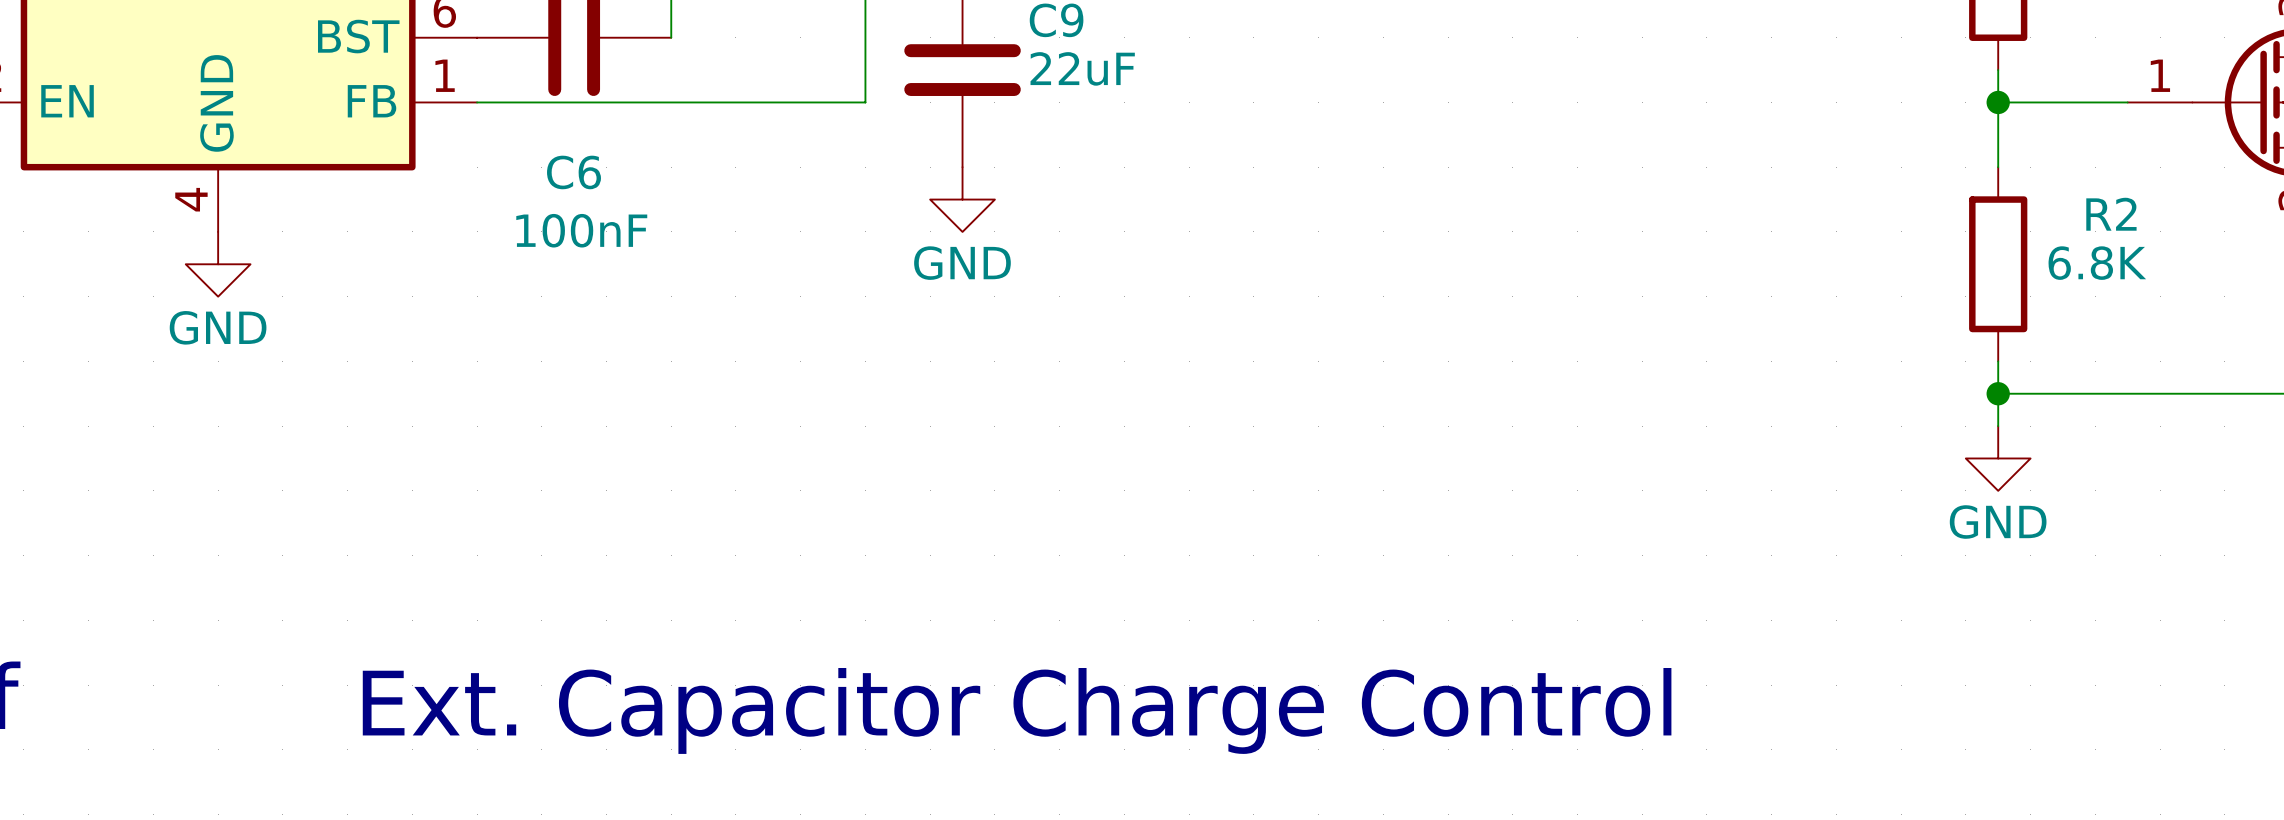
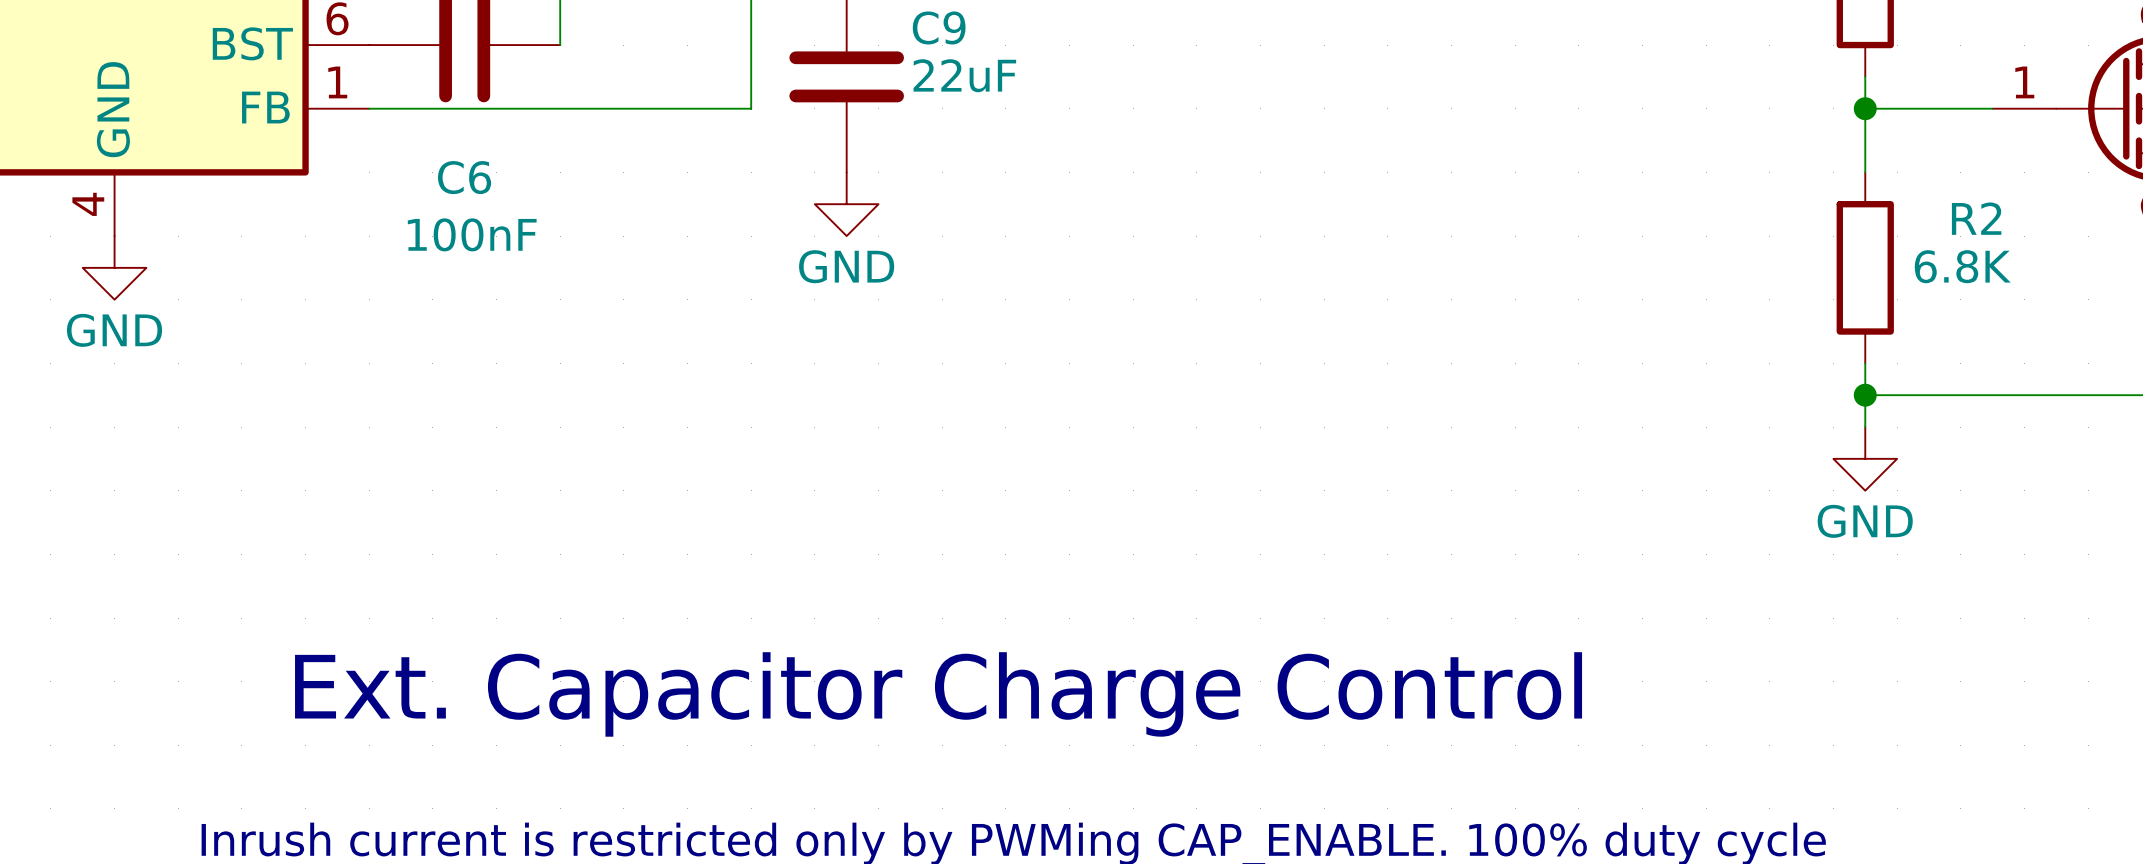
text position: Ext. Capacitor Charge Control (1017, 710) -> Ext. Capacitor Charge Control (938, 694)

